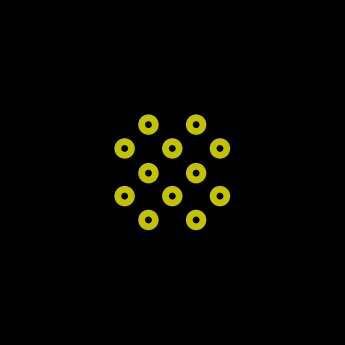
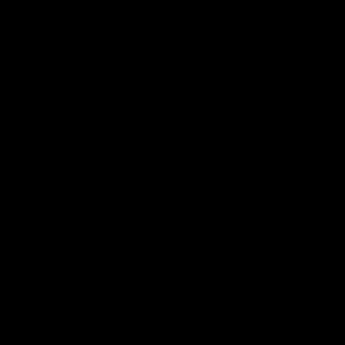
part: (172, 172) -> none

